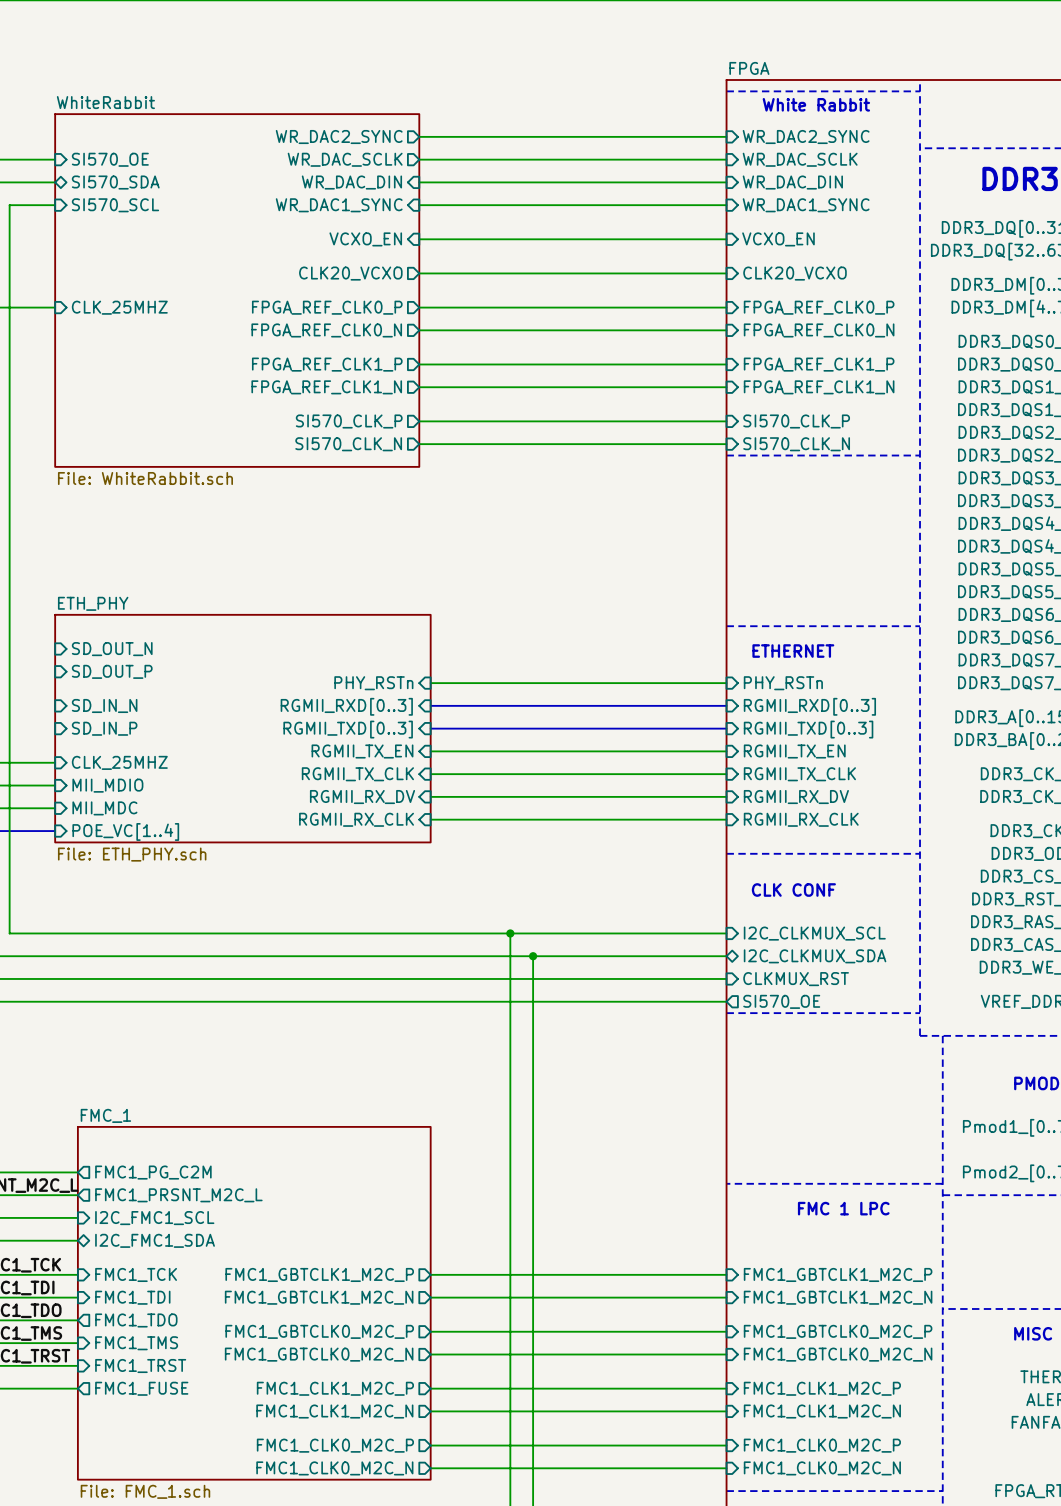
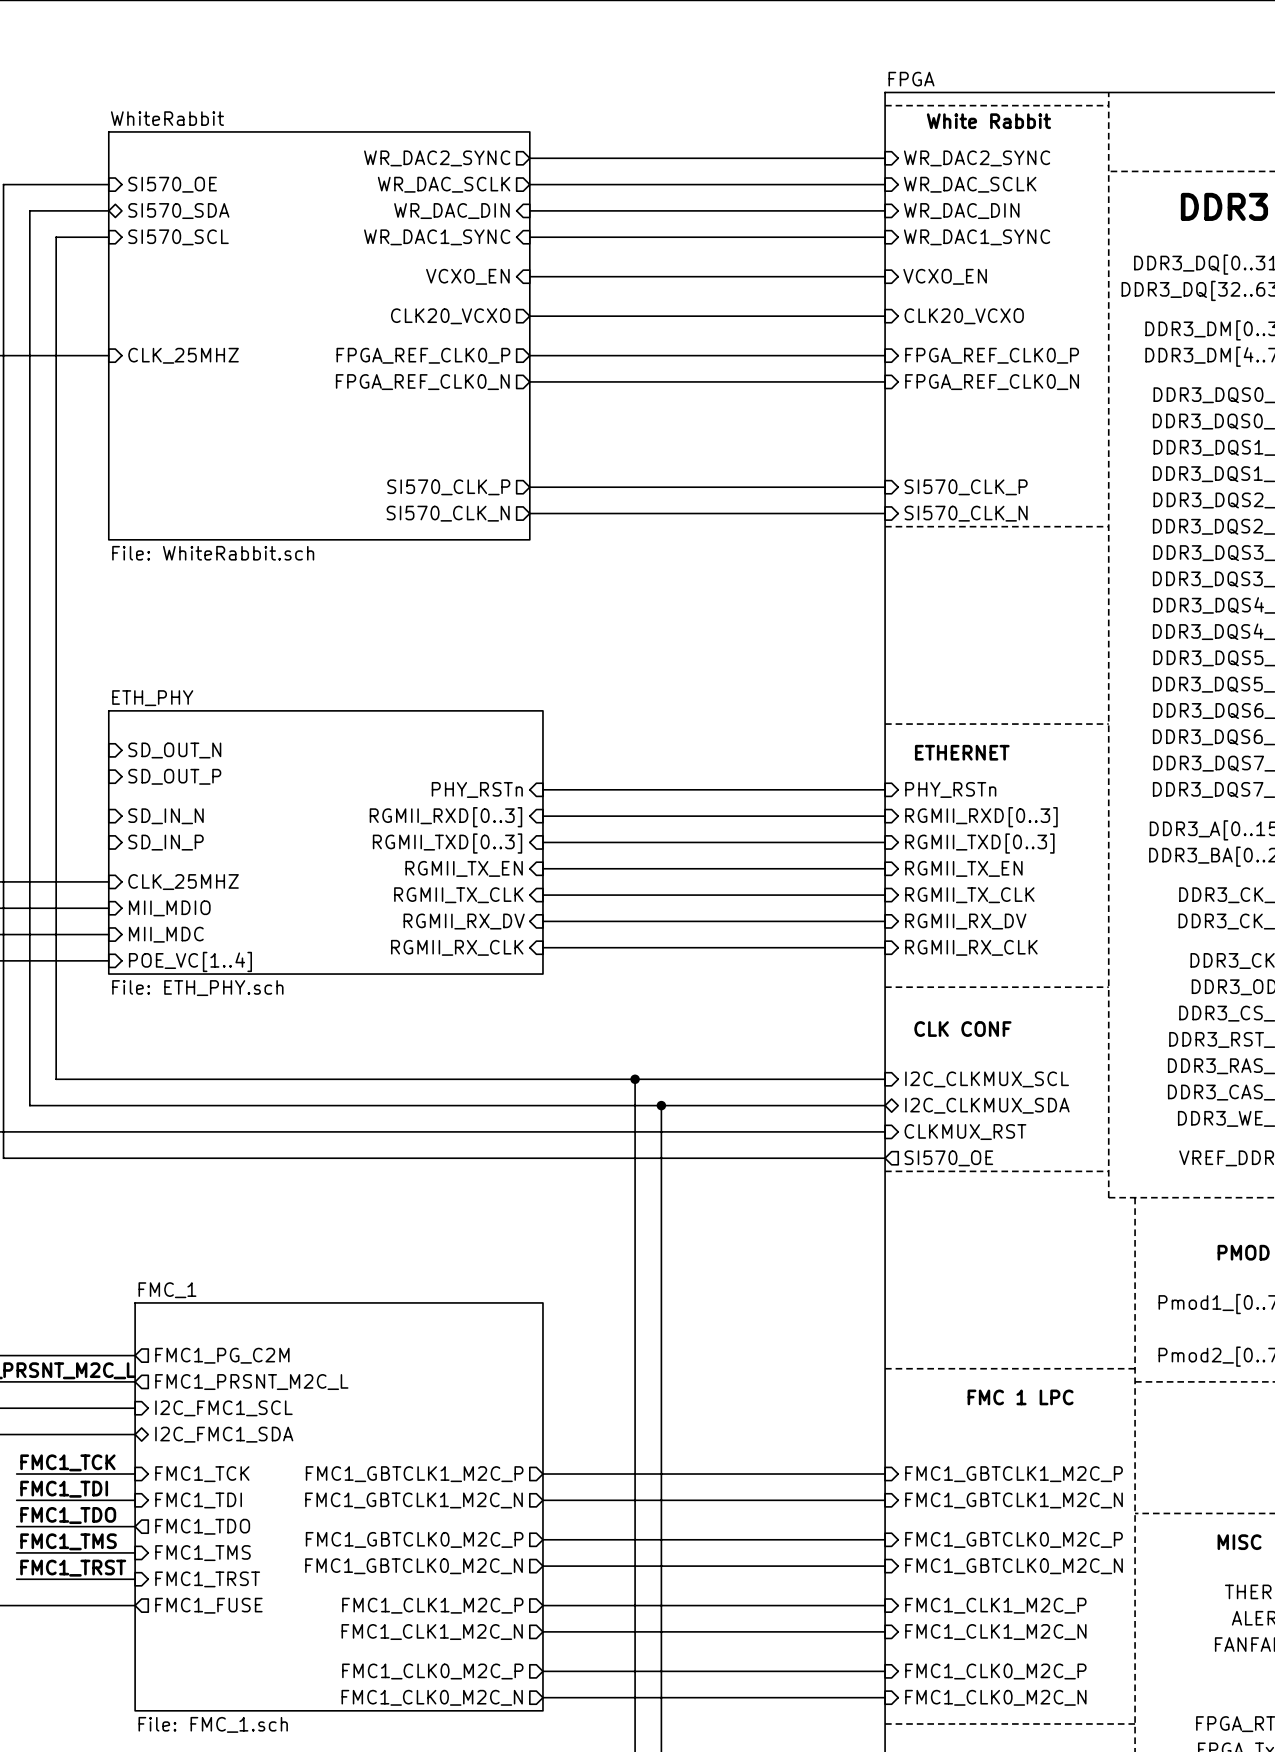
sheet pin: FPGA_REF_CLK1_P (327, 364) -> none
wire: (419, 364) (726, 364) -> none
sheet pin: FPGA_REF_CLK1_P (819, 364) -> none
sheet pin: FPGA_REF_CLK1_N (326, 387) -> none
wire: (419, 387) (726, 387) -> none
sheet pin: FPGA_REF_CLK1_N (819, 387) -> none

